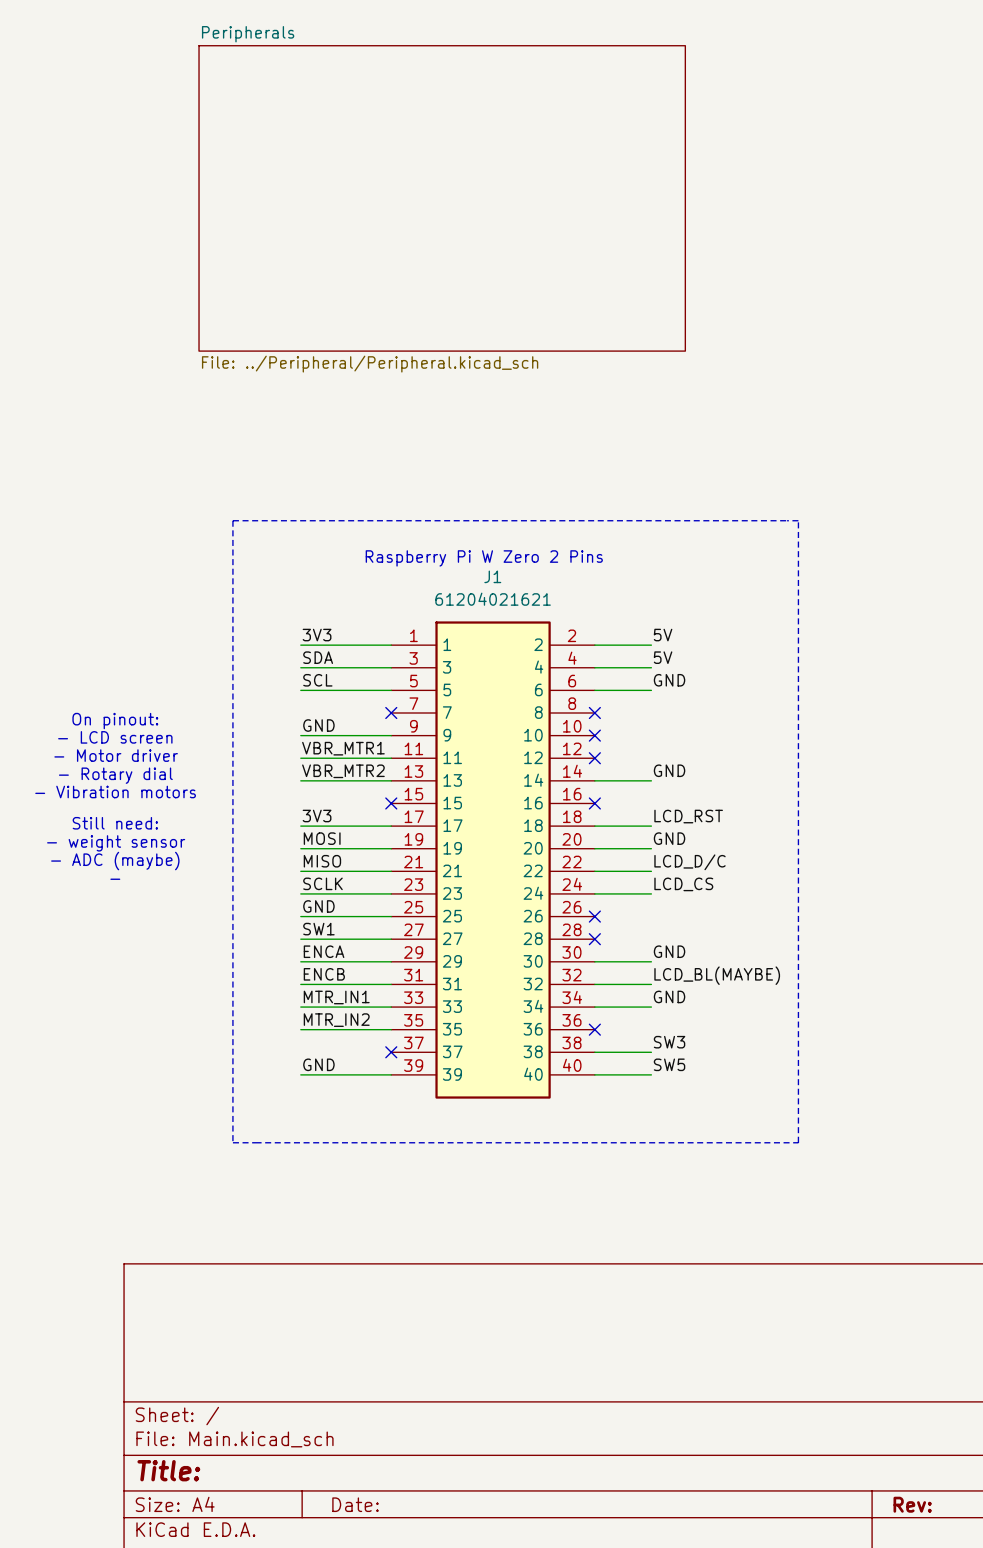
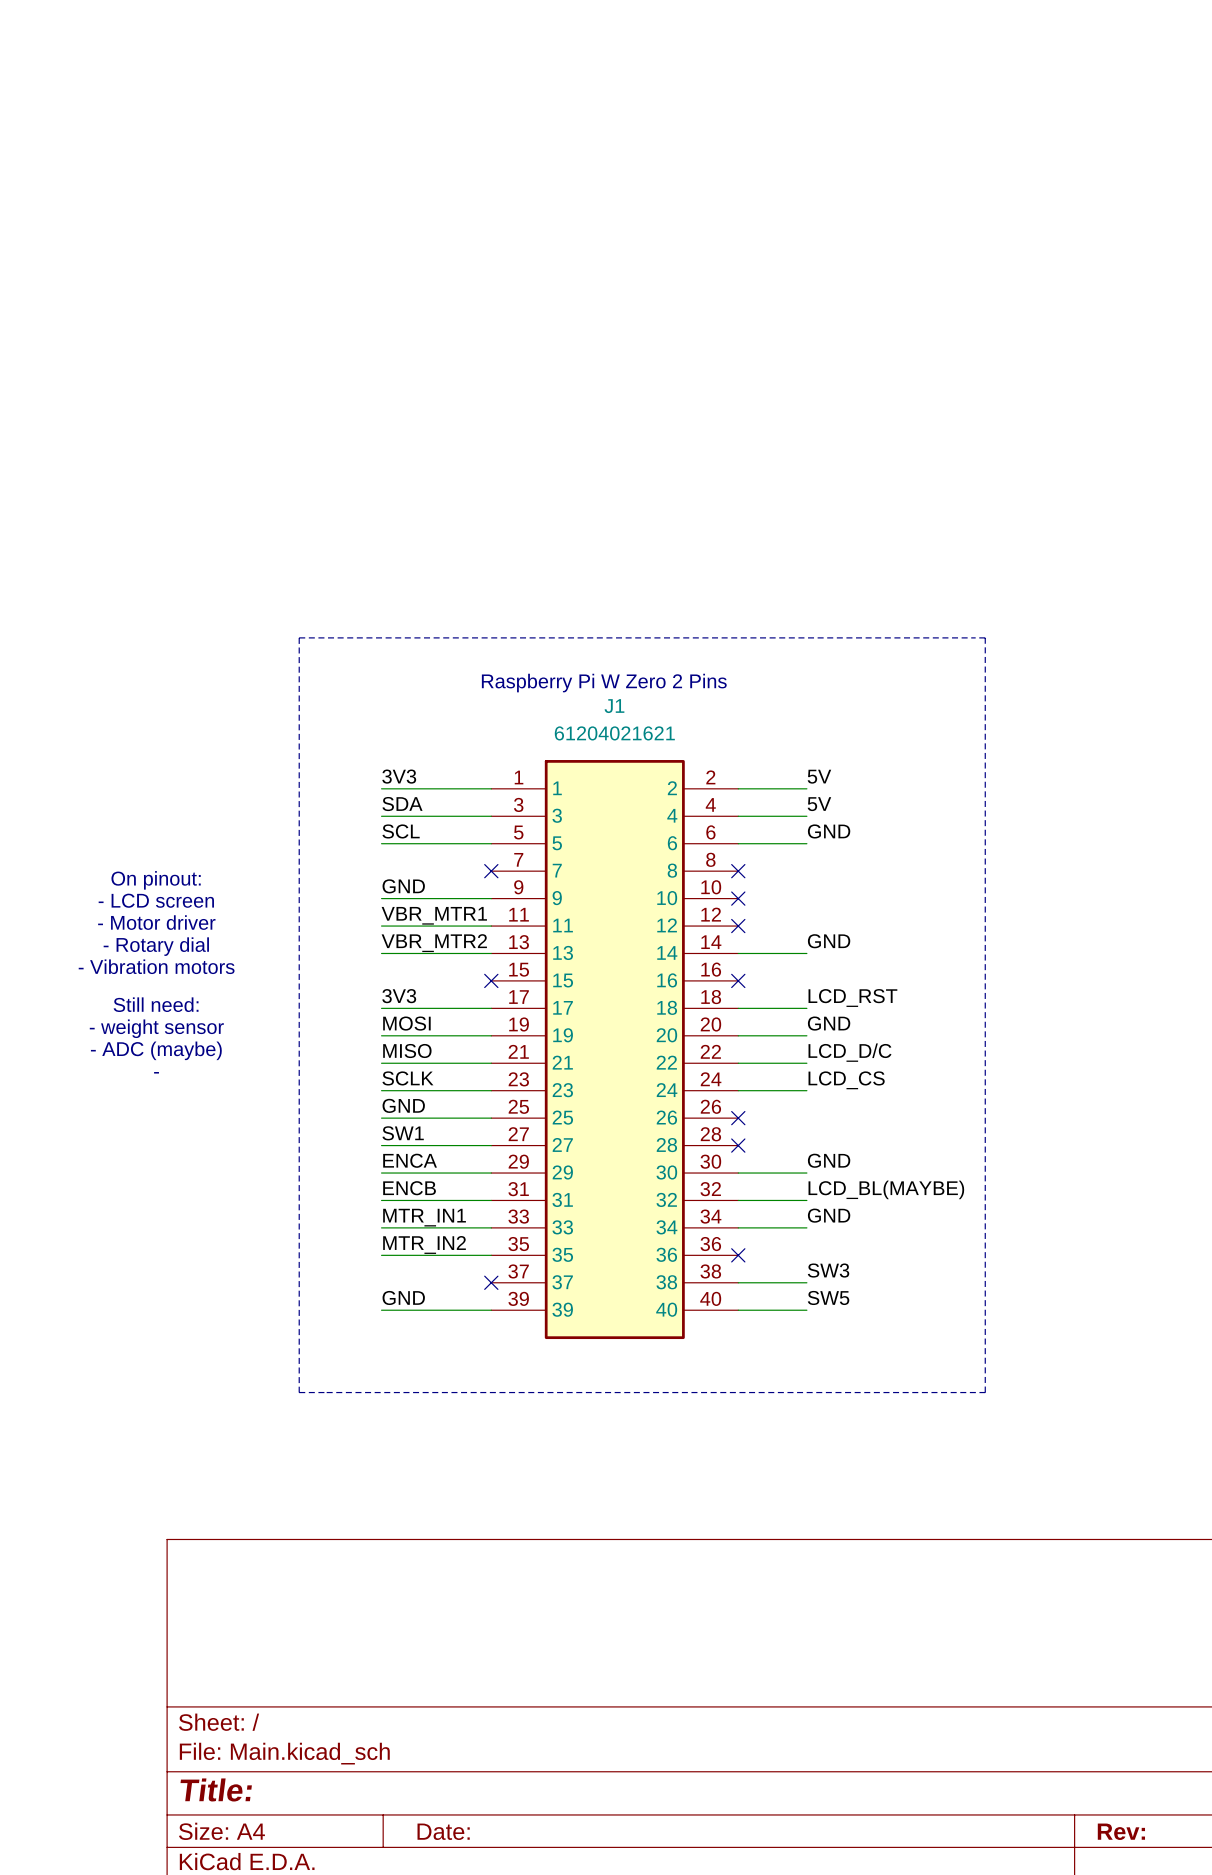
sheet Peripherals: File: ../Peripheral/Peripheral.kicad_sch (442, 198) -> none

